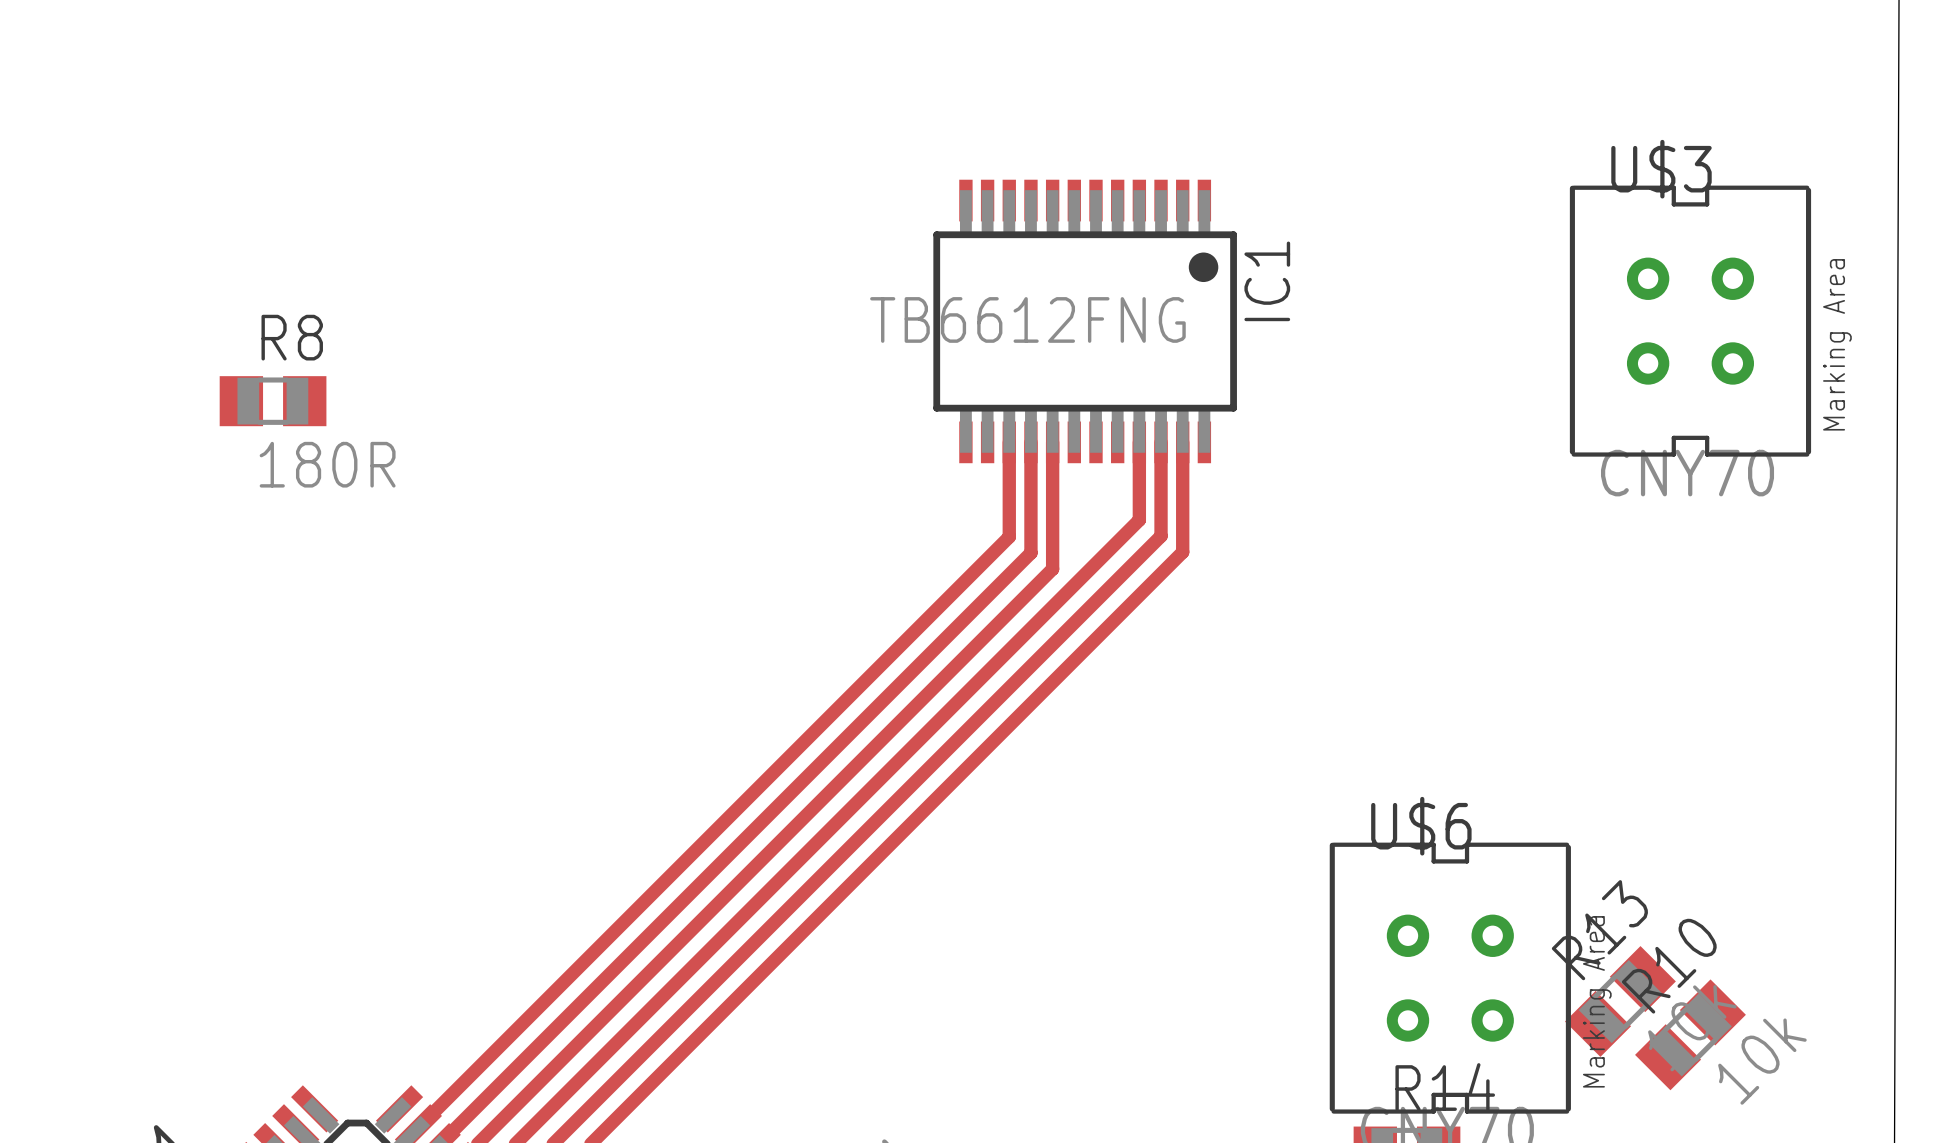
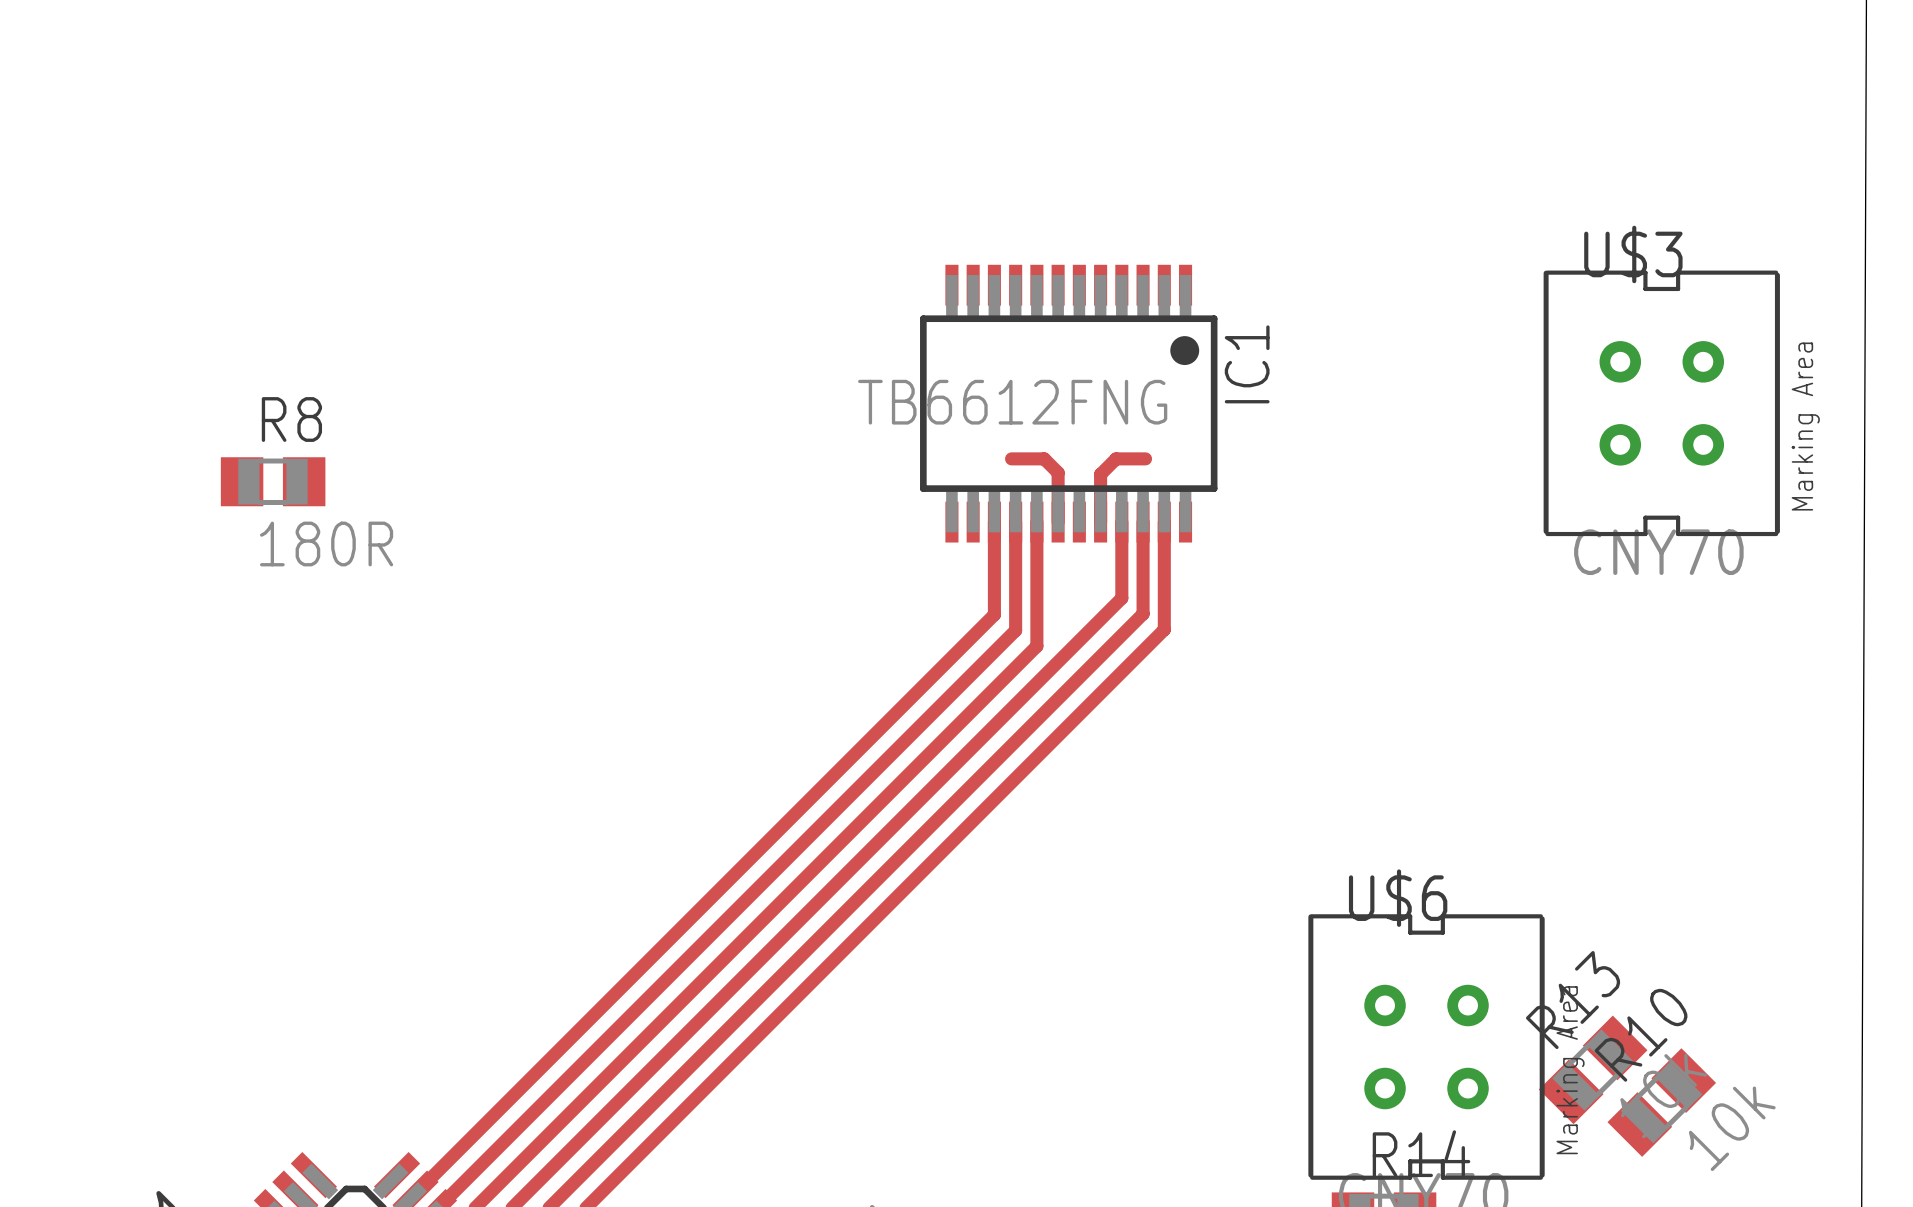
top track: none -> (1011, 458) (1044, 458) (1058, 472) (1058, 522)
top track: none -> (1145, 458) (1116, 458) (1100, 474) (1100, 522)

